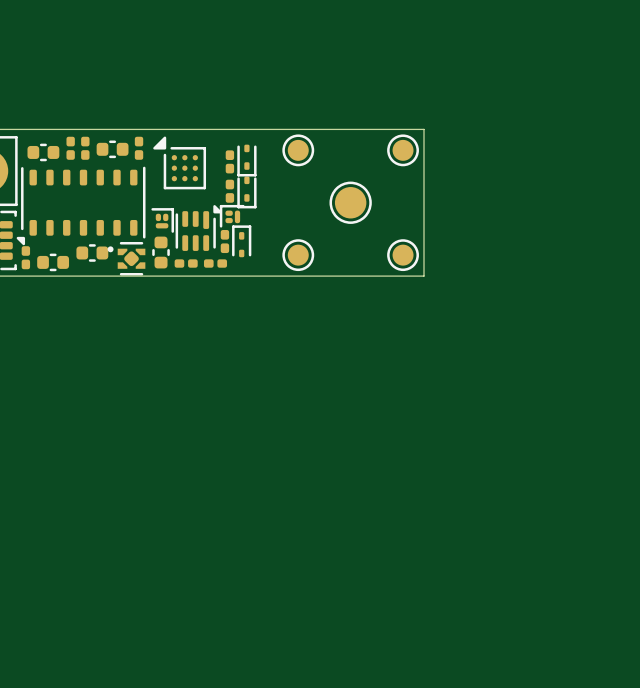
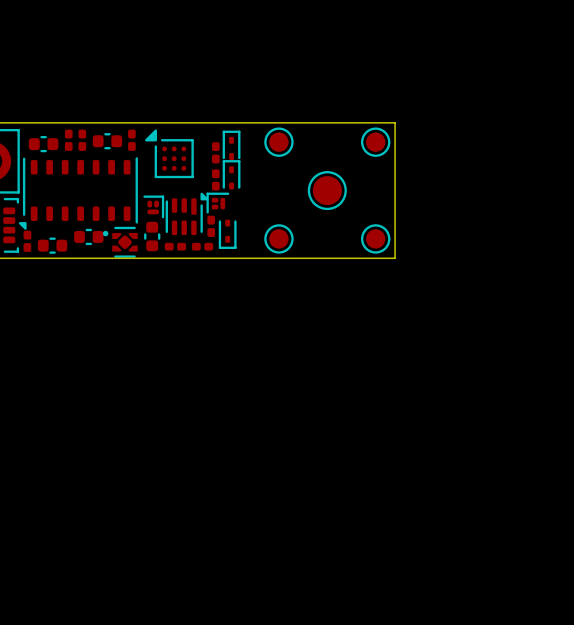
part rotation: 0° (246, 160) -> 180° (231, 145)
part rotation: 0° (246, 192) -> 180° (231, 174)
part rotation: 0° (241, 241) -> 180° (227, 234)

